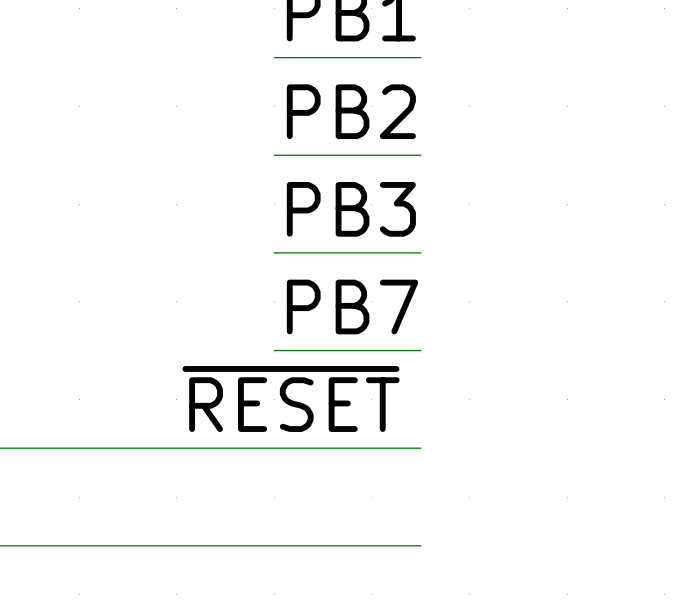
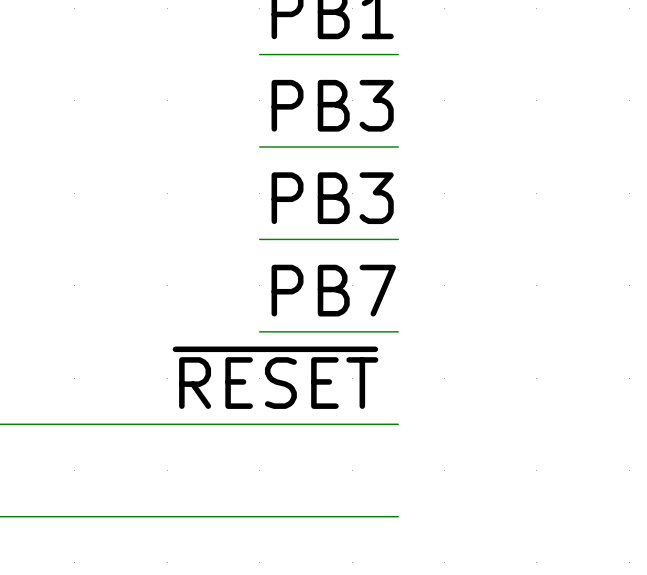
label: PB2 (351, 111) -> PB3 (332, 105)

